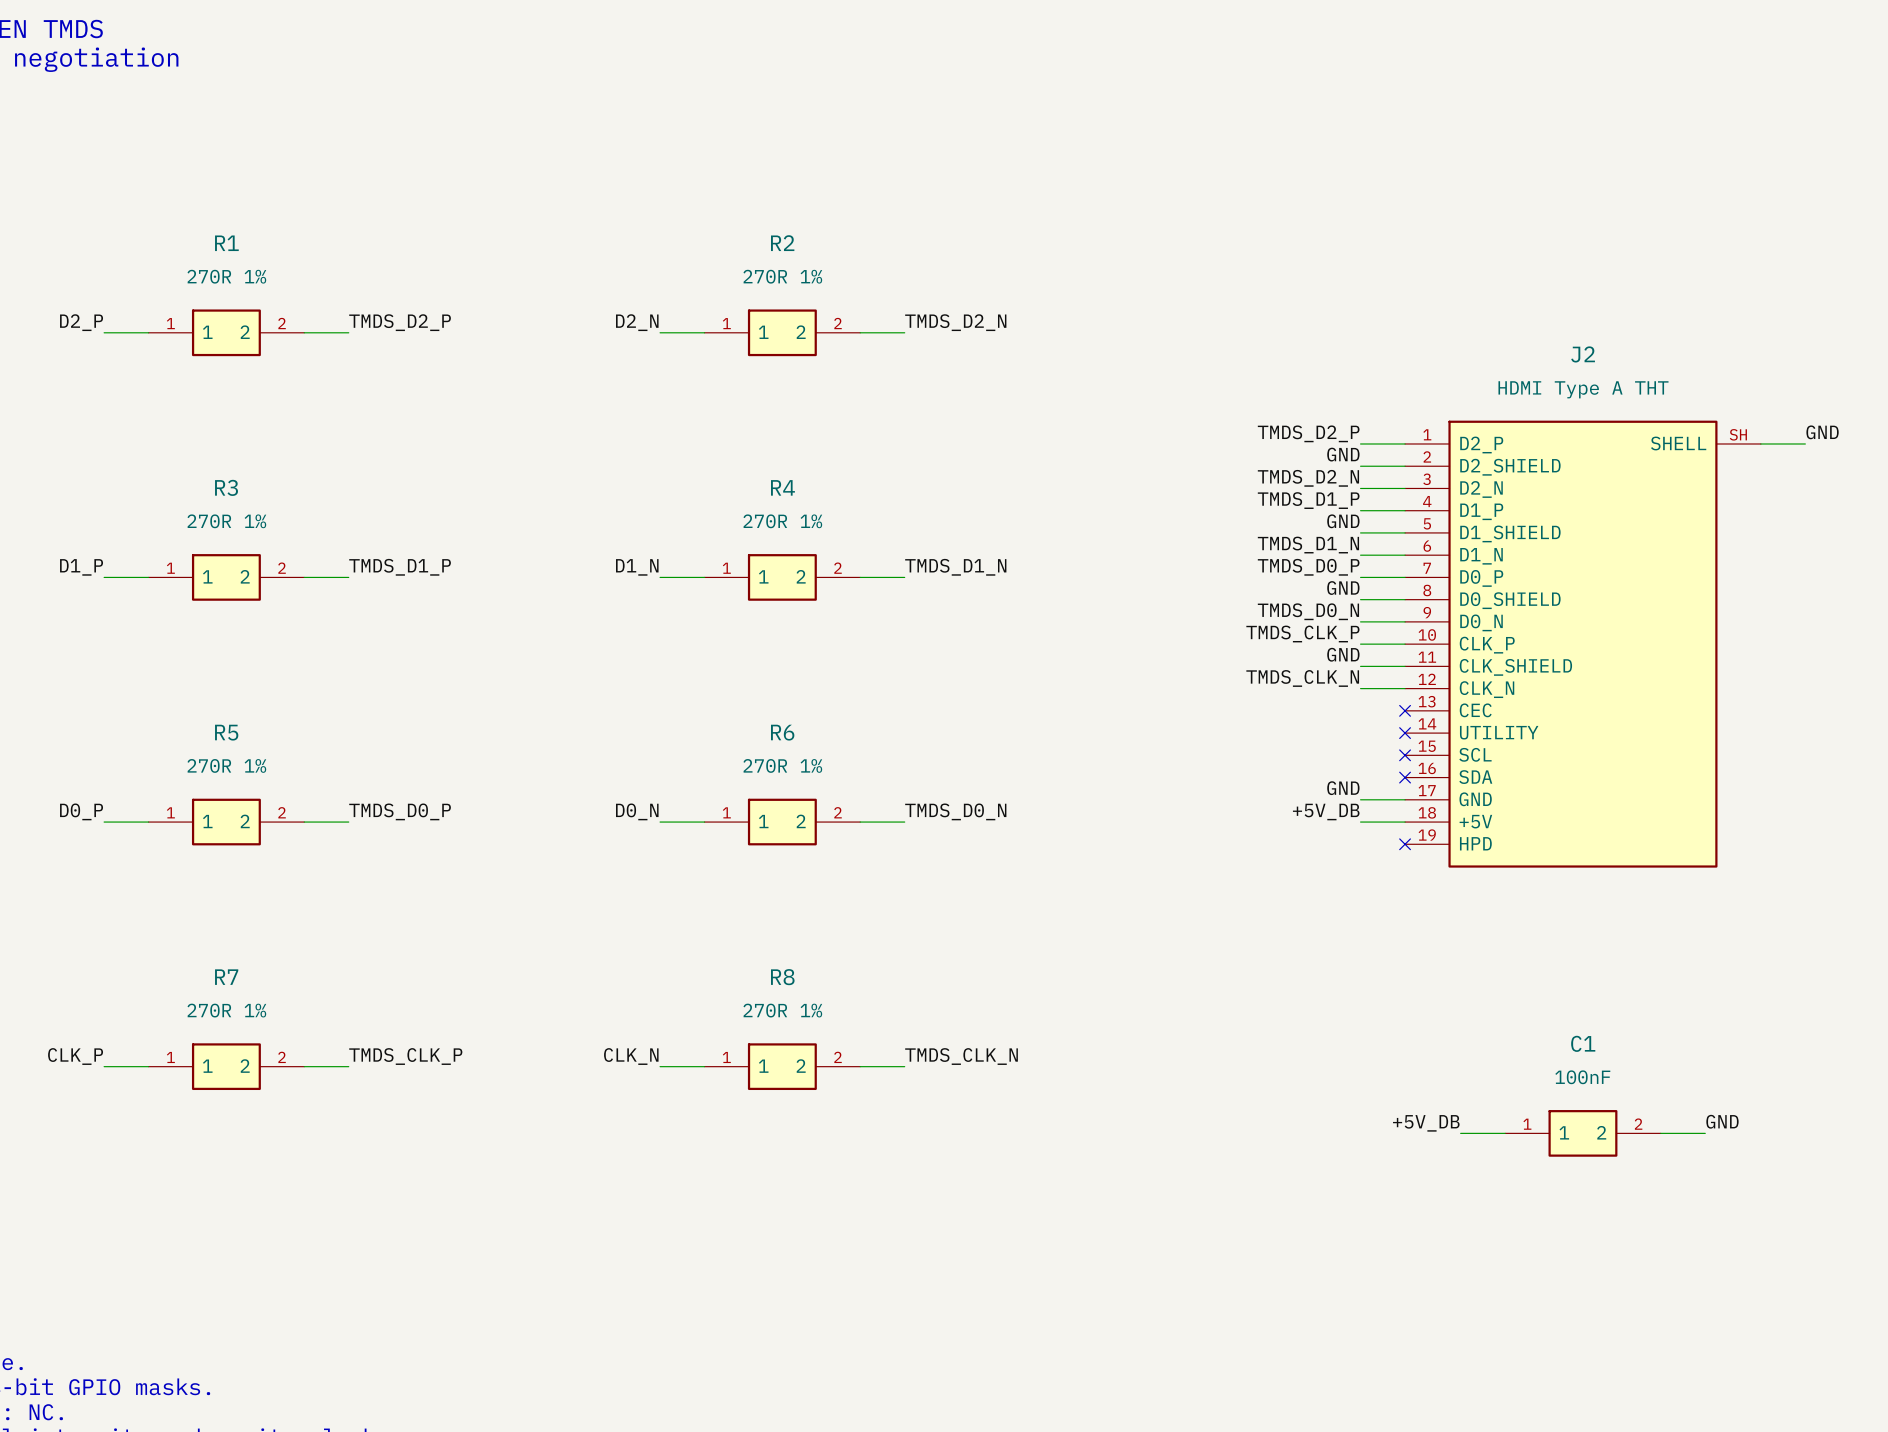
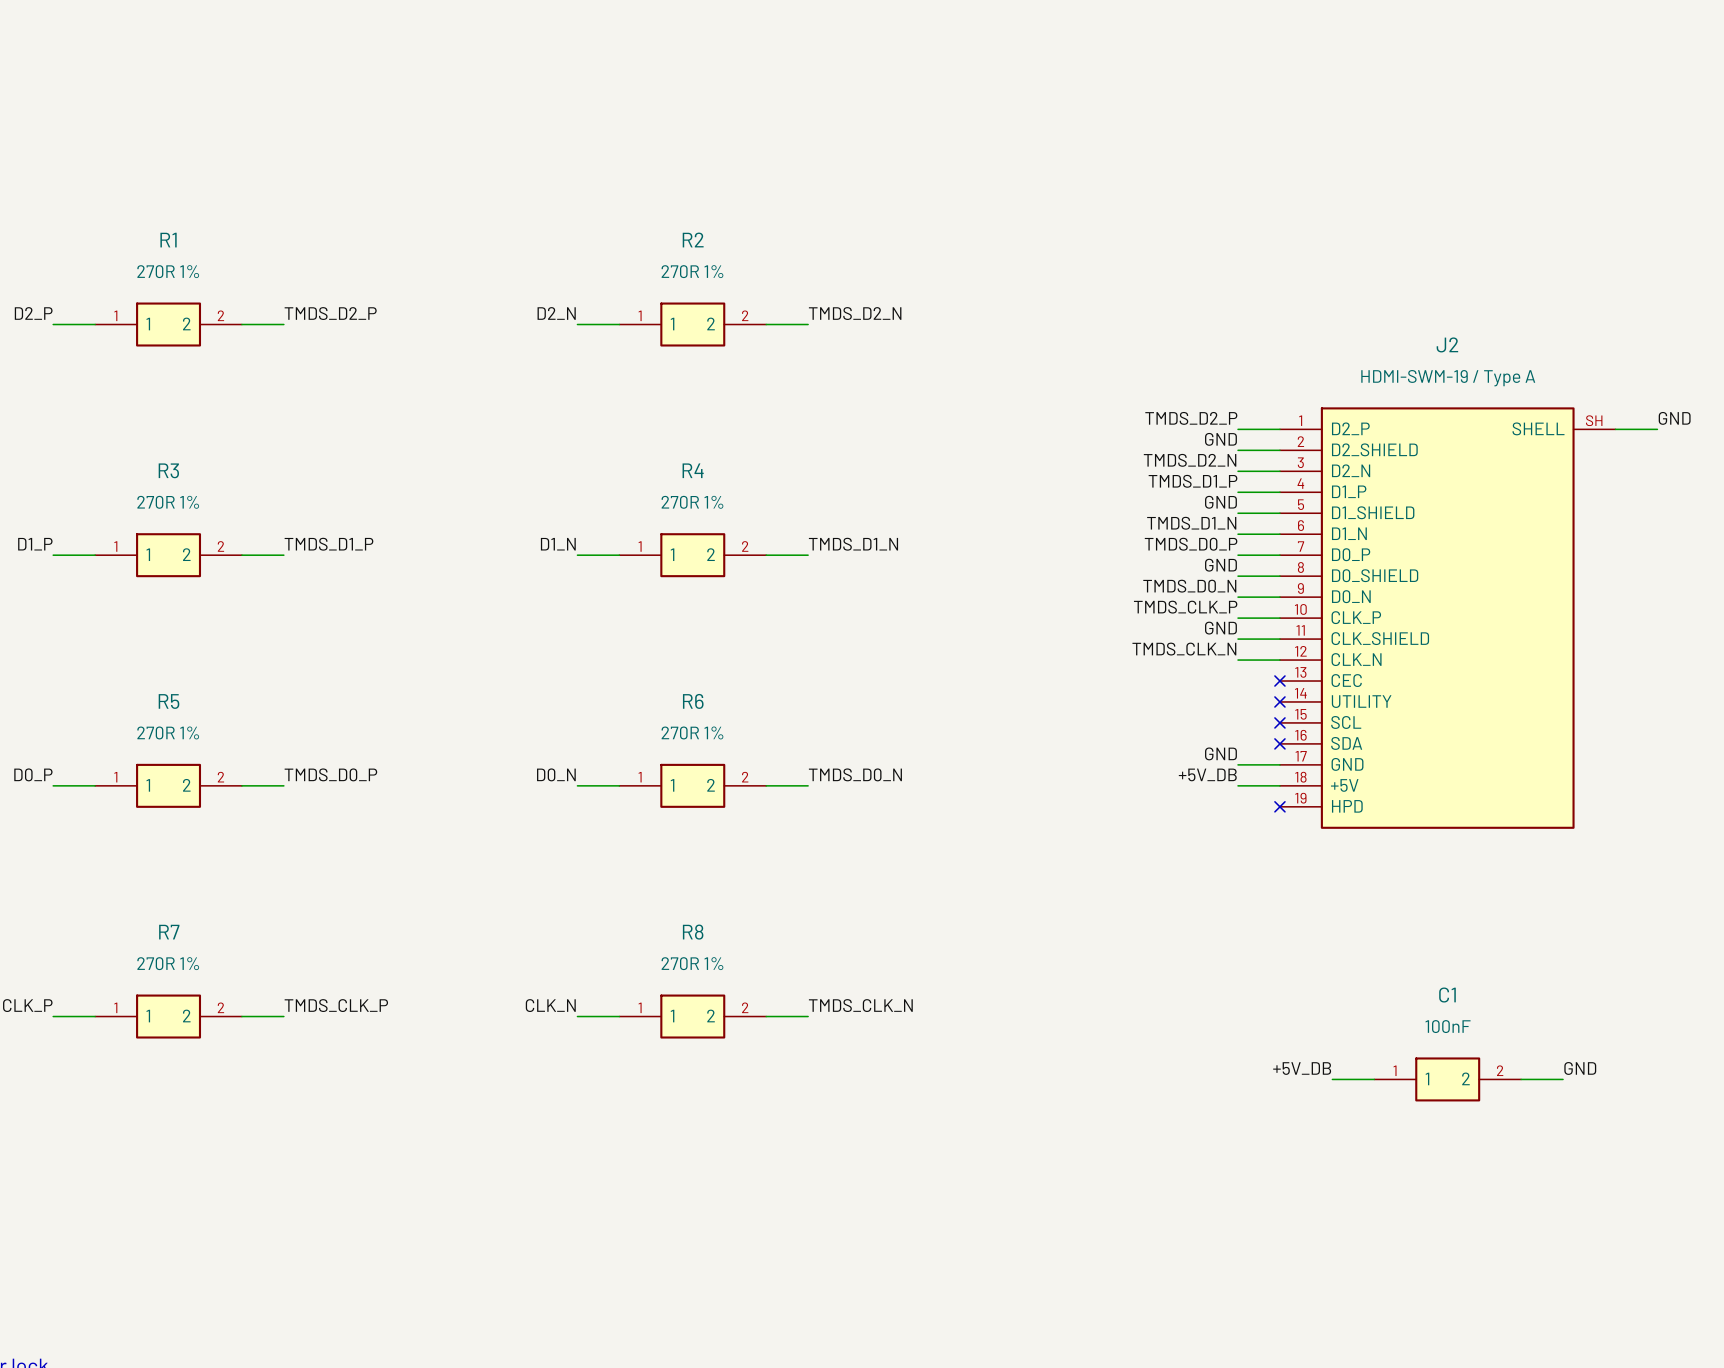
J2 value: HDMI Type A THT (1583, 389) -> HDMI-SWM-19 / Type A (1448, 378)

